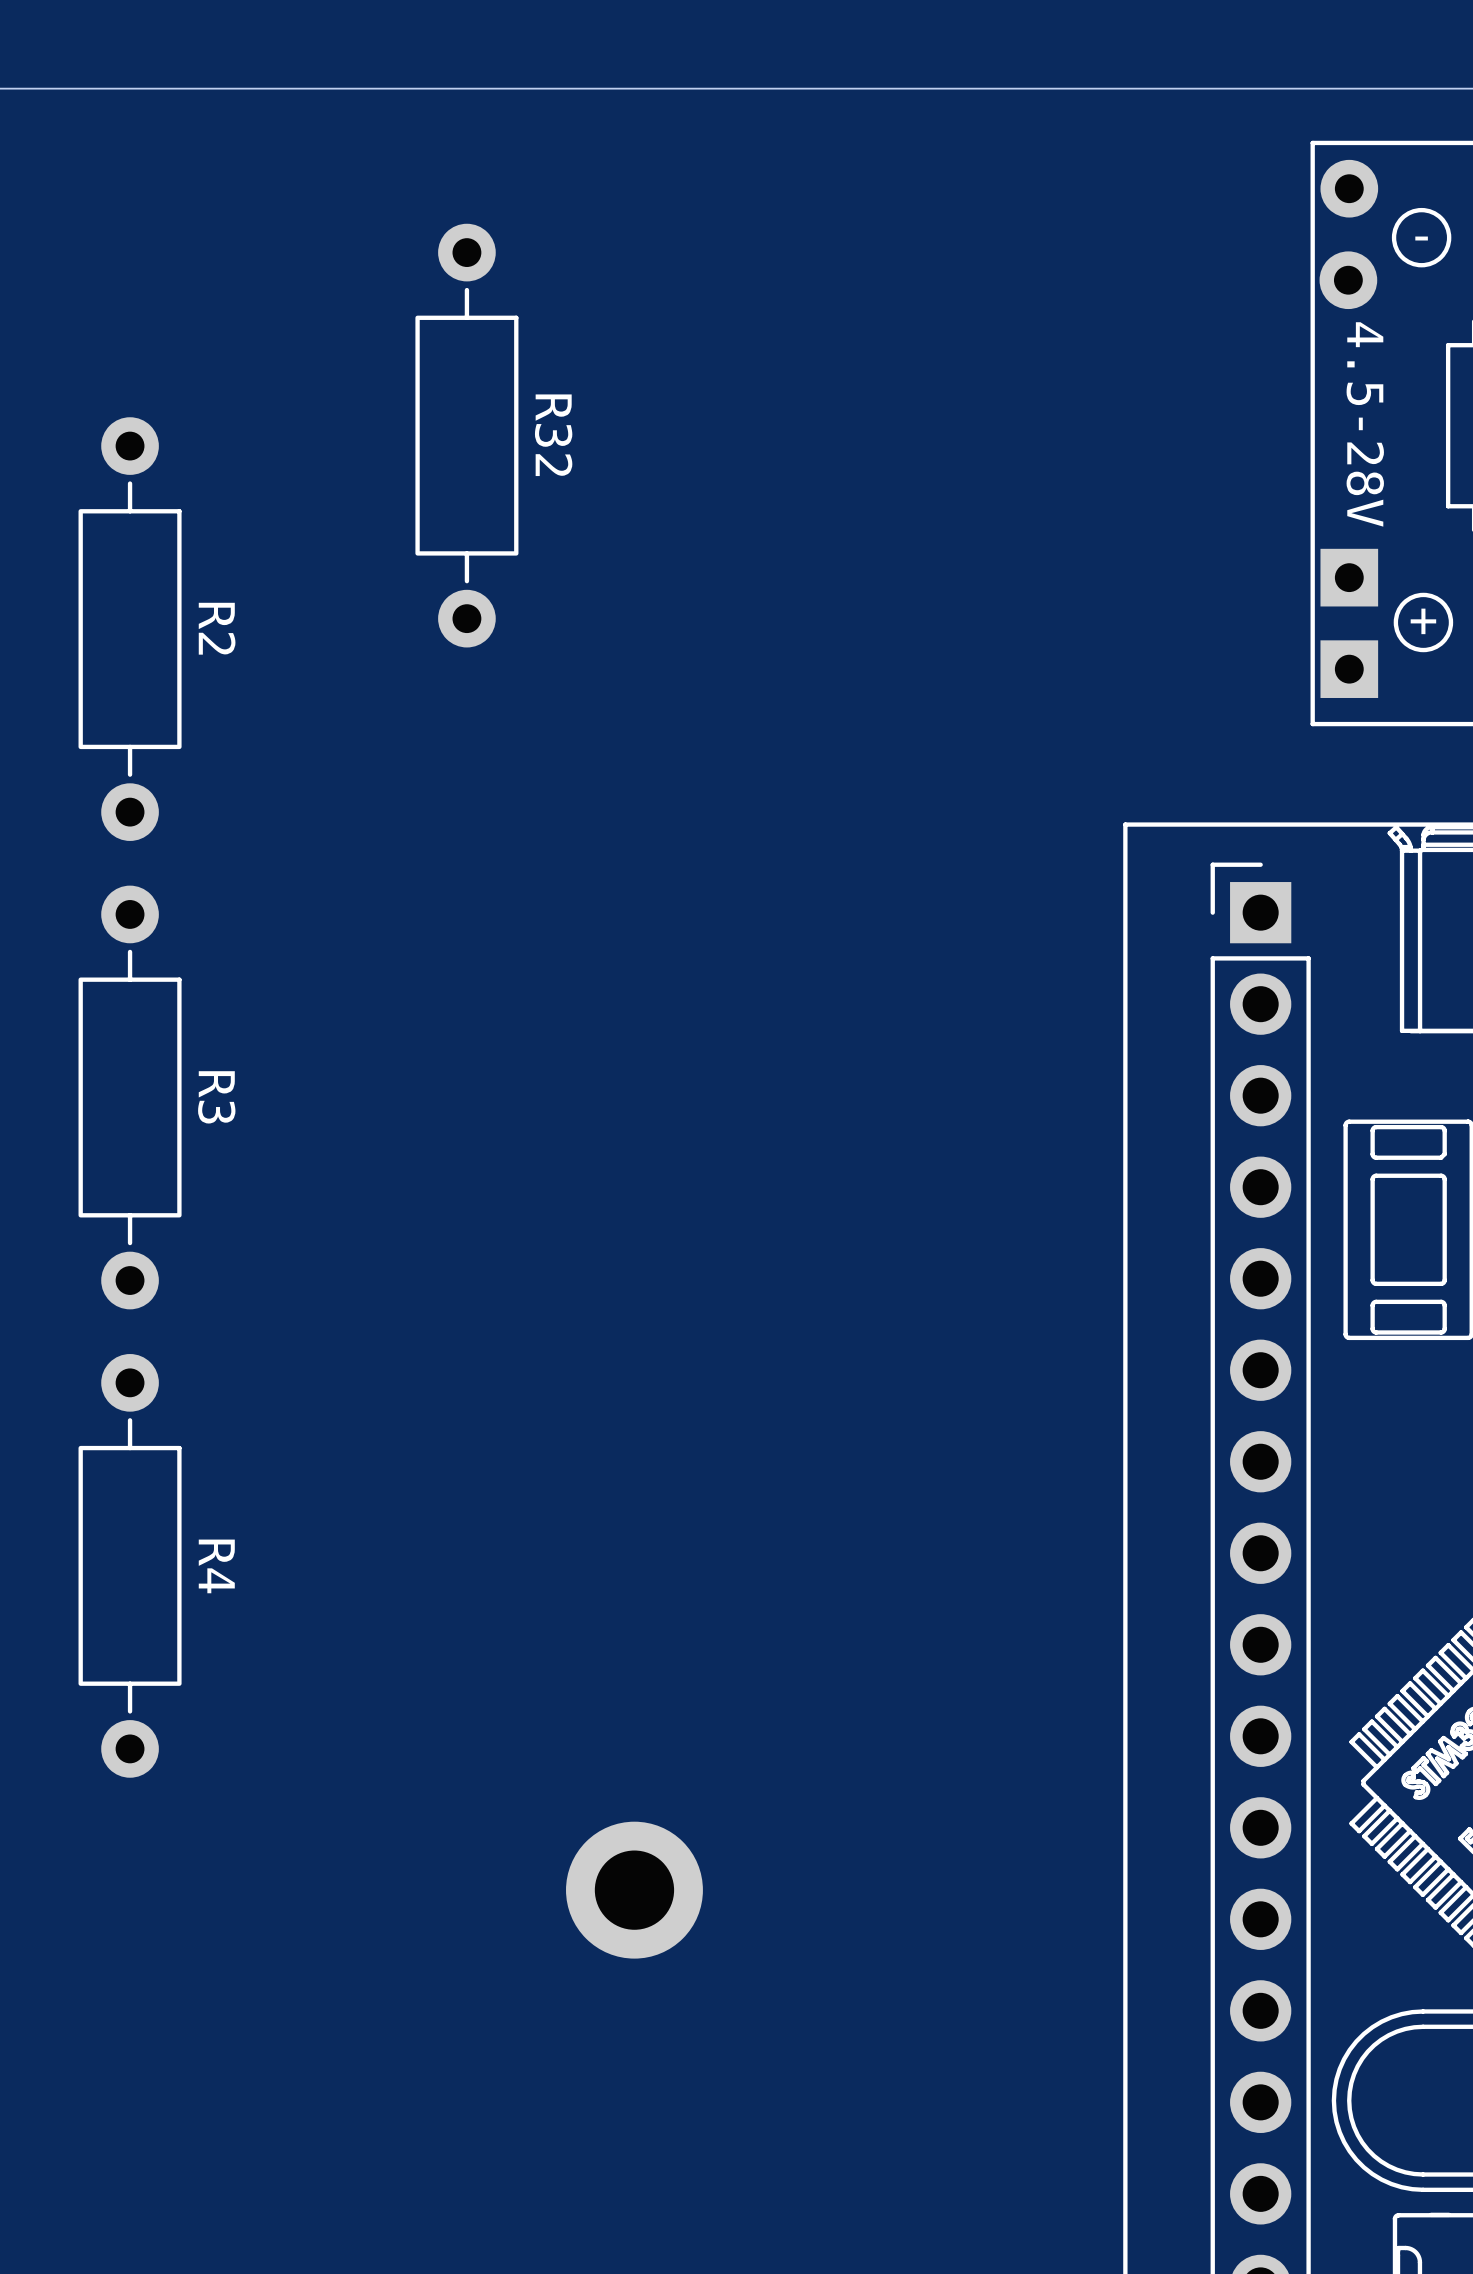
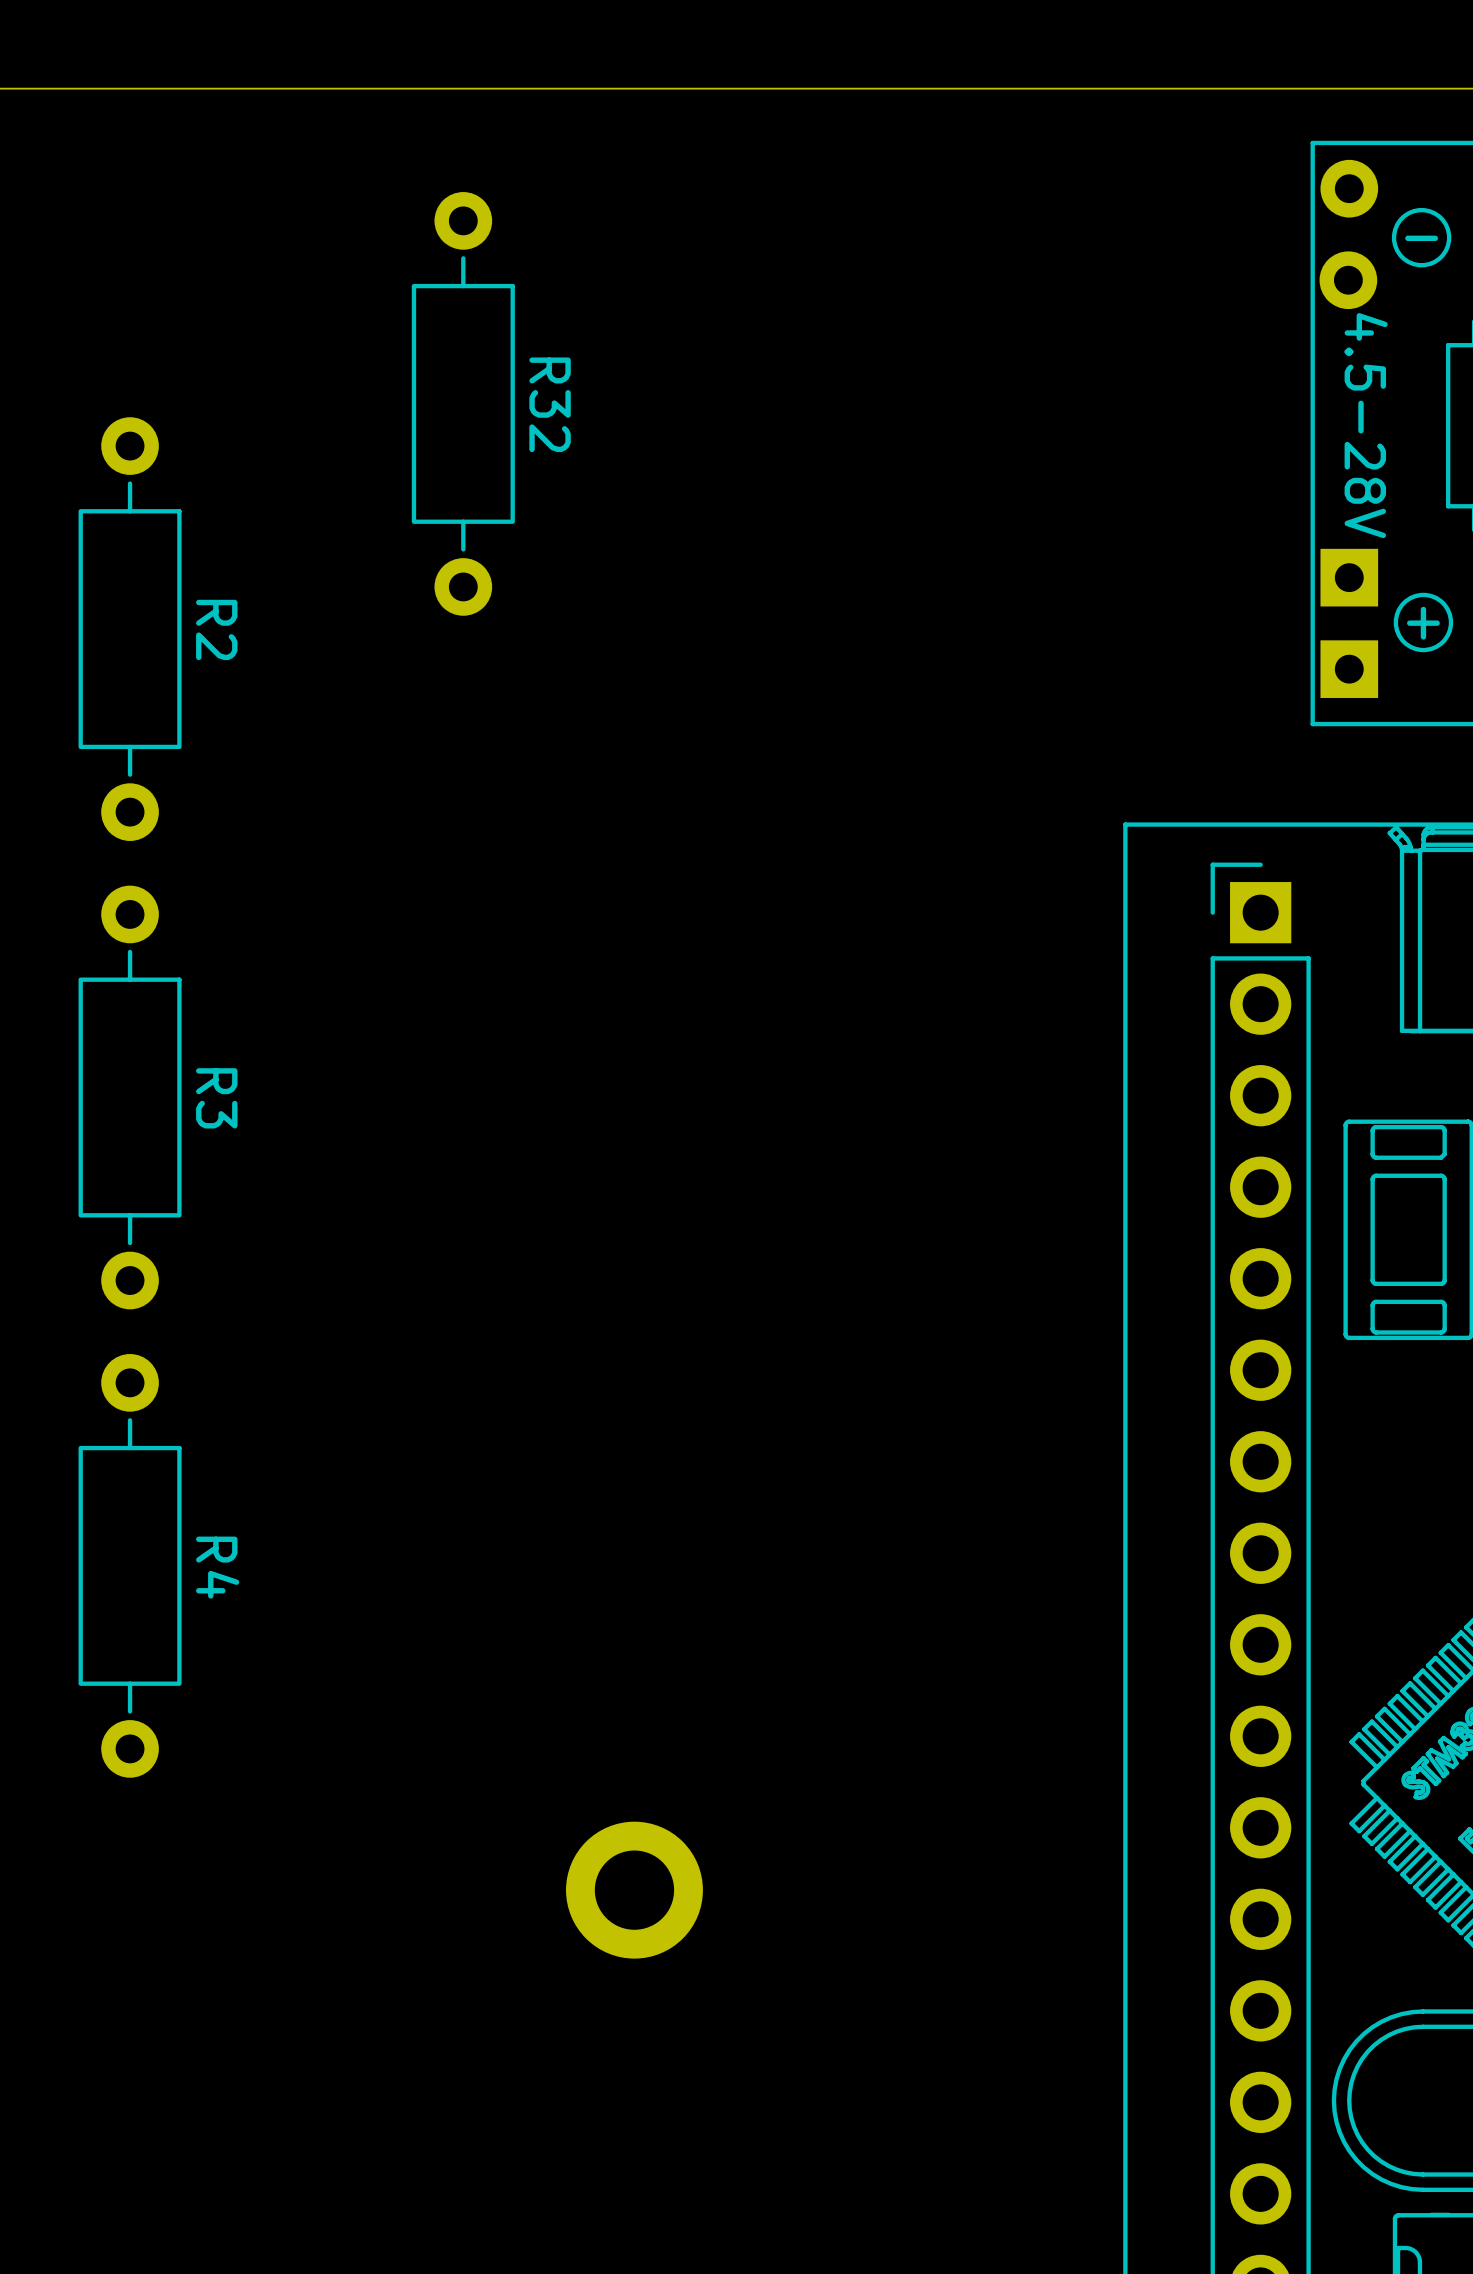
R32 position: (466, 435) -> (463, 403)

